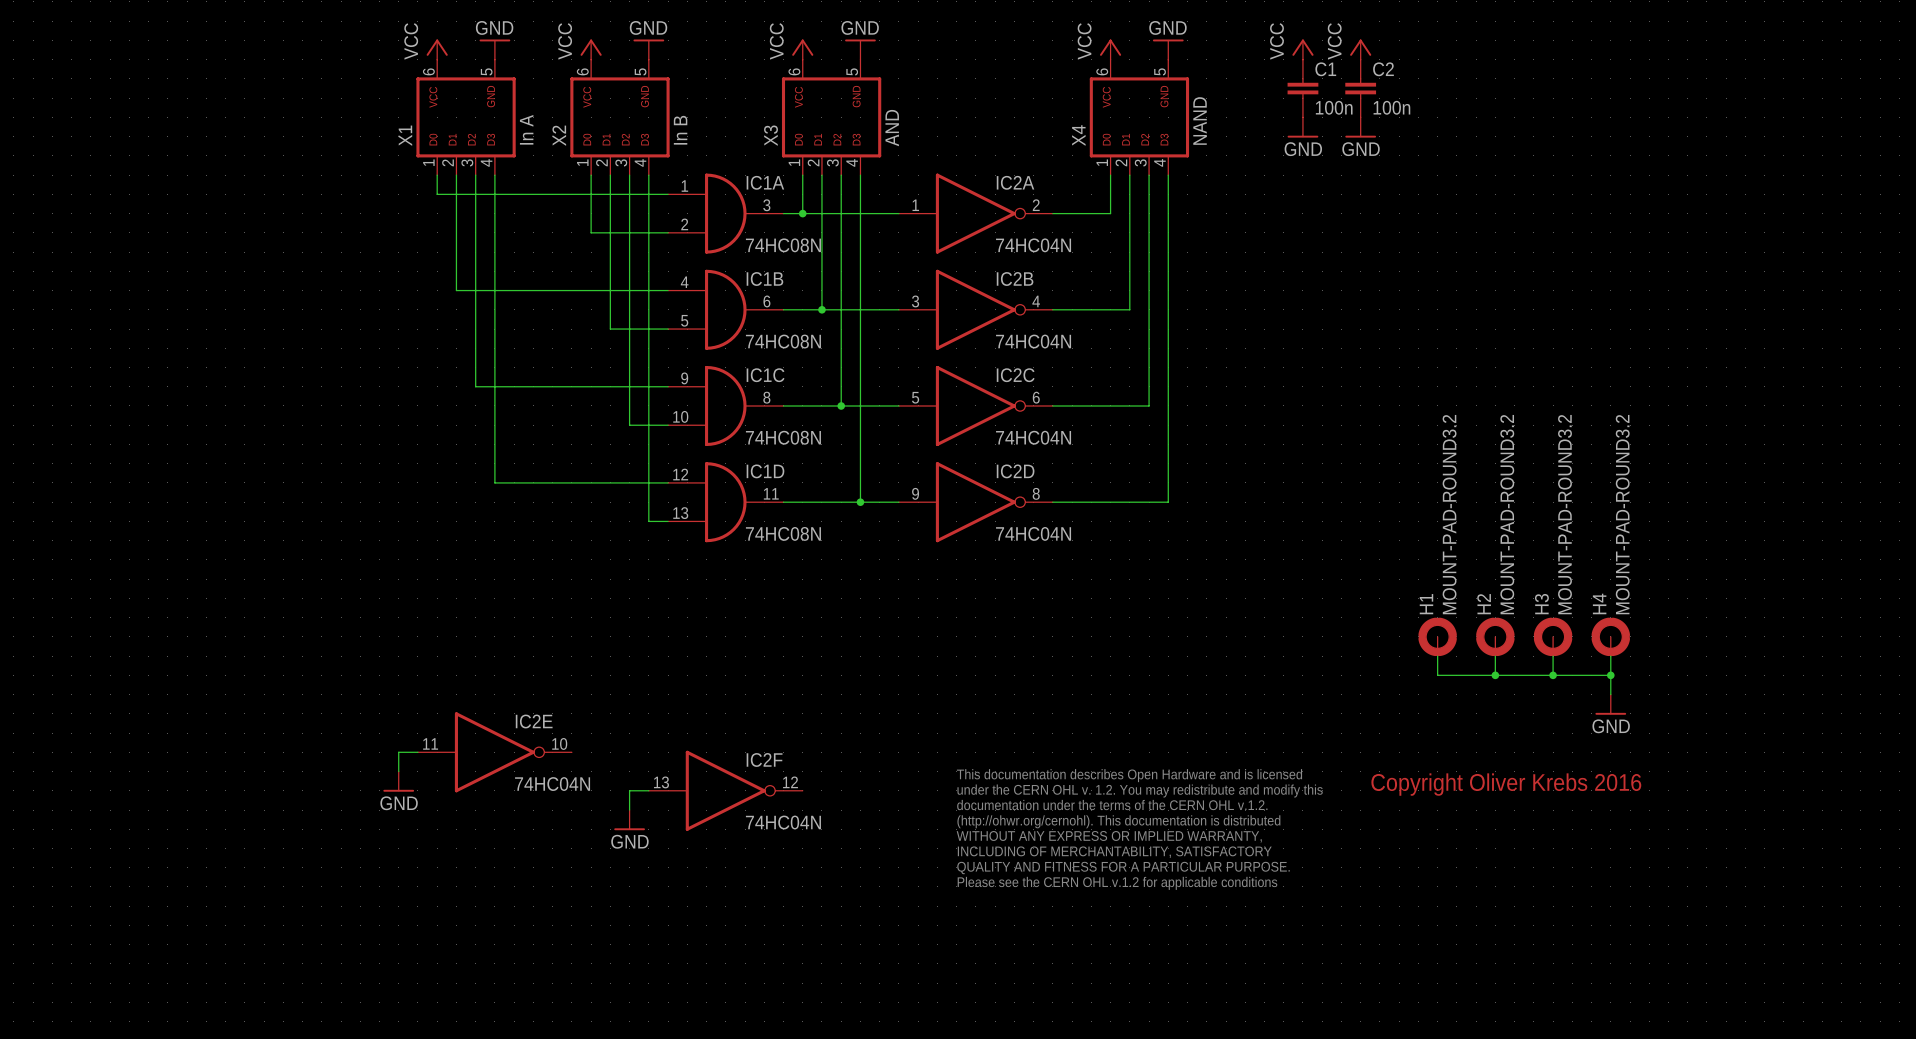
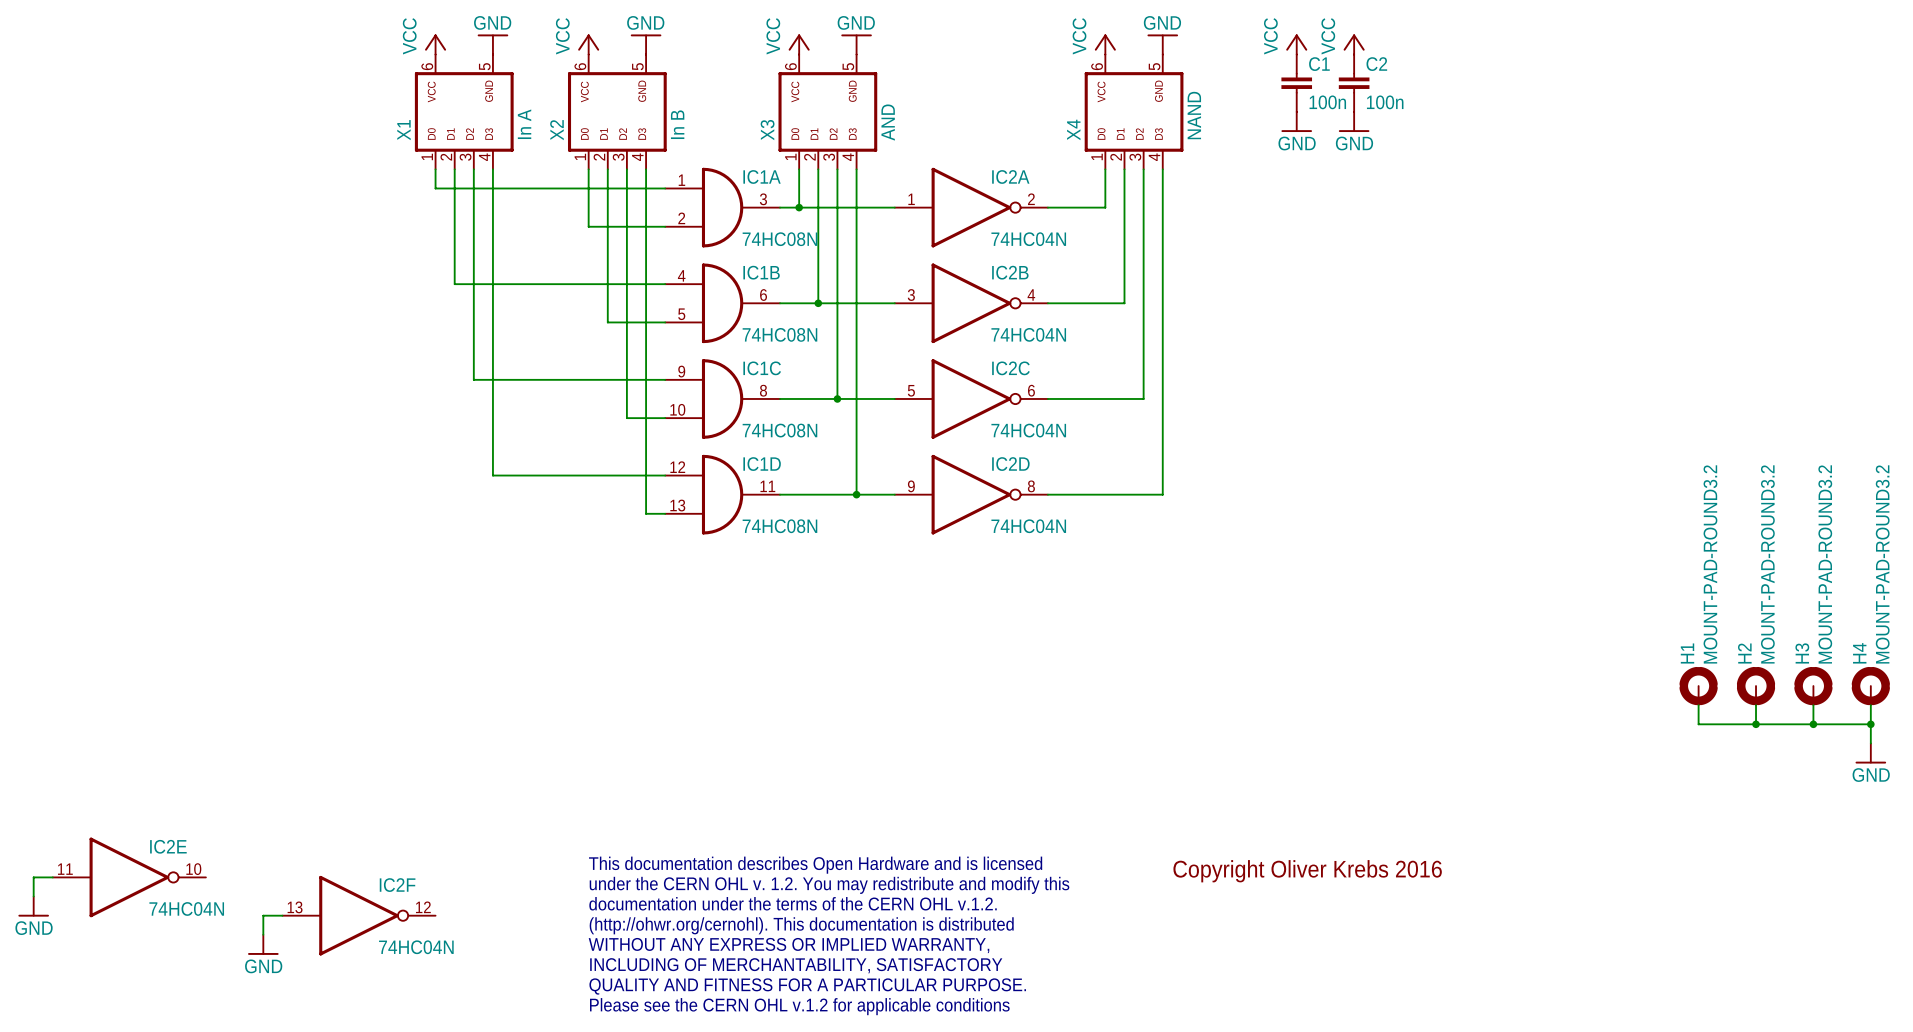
H1 position: (1437, 636) -> (1698, 686)
H2 position: (1495, 636) -> (1756, 686)
H3 position: (1553, 636) -> (1813, 686)
H4 position: (1610, 636) -> (1870, 686)
wire: (1437, 656) (1437, 675) (1610, 675) -> none
wire: (1495, 656) (1495, 675) -> none
wire: (1553, 656) (1553, 675) -> none
wire: (1610, 656) (1610, 694) -> none
junction: (1495, 675) -> none
junction: (1553, 675) -> none
junction: (1610, 675) -> none
power symbol: GND (1610, 704) -> none
wire: none -> (1698, 705) (1698, 724) (1870, 724)
wire: none -> (1756, 705) (1756, 724)
wire: none -> (1813, 705) (1813, 724)
wire: none -> (1870, 705) (1870, 743)
junction: none -> (1756, 724)
junction: none -> (1813, 724)
junction: none -> (1870, 724)
wire: (417, 752) (398, 752) (398, 771) -> none
IC2E position: (494, 752) -> (129, 877)
power symbol: none -> GND (1870, 753)
text: This documentation describes Open Hardware and is licensed (1129, 775) -> none
power symbol: GND (398, 781) -> none
text: Copyright Oliver Krebs 2016 (1506, 784) -> none
wire: (648, 790) (629, 790) (629, 810) -> none
IC2F position: (725, 790) -> (359, 915)
text: under the CERN OHL v. 1.2. You may redistribute and modify this (1140, 791) -> none
text: documentation under the terms of the CERN OHL v.1.2. (1112, 805) -> none
power symbol: GND (629, 820) -> none
text: (http://ohwr.org/cernohl). This documentation is distributed (1118, 821) -> none
text: WITHOUT ANY EXPRESS OR IMPLIED WARRANTY, (1109, 836) -> none
text: INCLUDING OF MERCHANTABILITY, SATISFACTORY (1114, 852) -> none
text: QUALITY AND FITNESS FOR A PARTICULAR PURPOSE. (1123, 868) -> none
text: none -> This documentation describes Open Hardware and is licensed (815, 865)
text: none -> Copyright Oliver Krebs 2016 (1307, 871)
text: Please see the CERN OHL v.1.2 for applicable conditions (1117, 883) -> none
wire: none -> (52, 877) (33, 877) (33, 896)
text: none -> under the CERN OHL v. 1.2. You may redistribute and modify this (829, 885)
text: none -> documentation under the terms of the CERN OHL v.1.2. (793, 903)
power symbol: none -> GND (33, 906)
wire: none -> (282, 915) (263, 915) (263, 934)
text: none -> (http://ohwr.org/cernohl). This documentation is distributed (801, 925)
power symbol: none -> GND (263, 944)
text: none -> WITHOUT ANY EXPRESS OR IMPLIED WARRANTY, (789, 945)
text: none -> INCLUDING OF MERCHANTABILITY, SATISFACTORY (796, 965)
text: none -> QUALITY AND FITNESS FOR A PARTICULAR PURPOSE. (807, 986)
text: none -> Please see the CERN OHL v.1.2 for applicable conditions (799, 1006)

